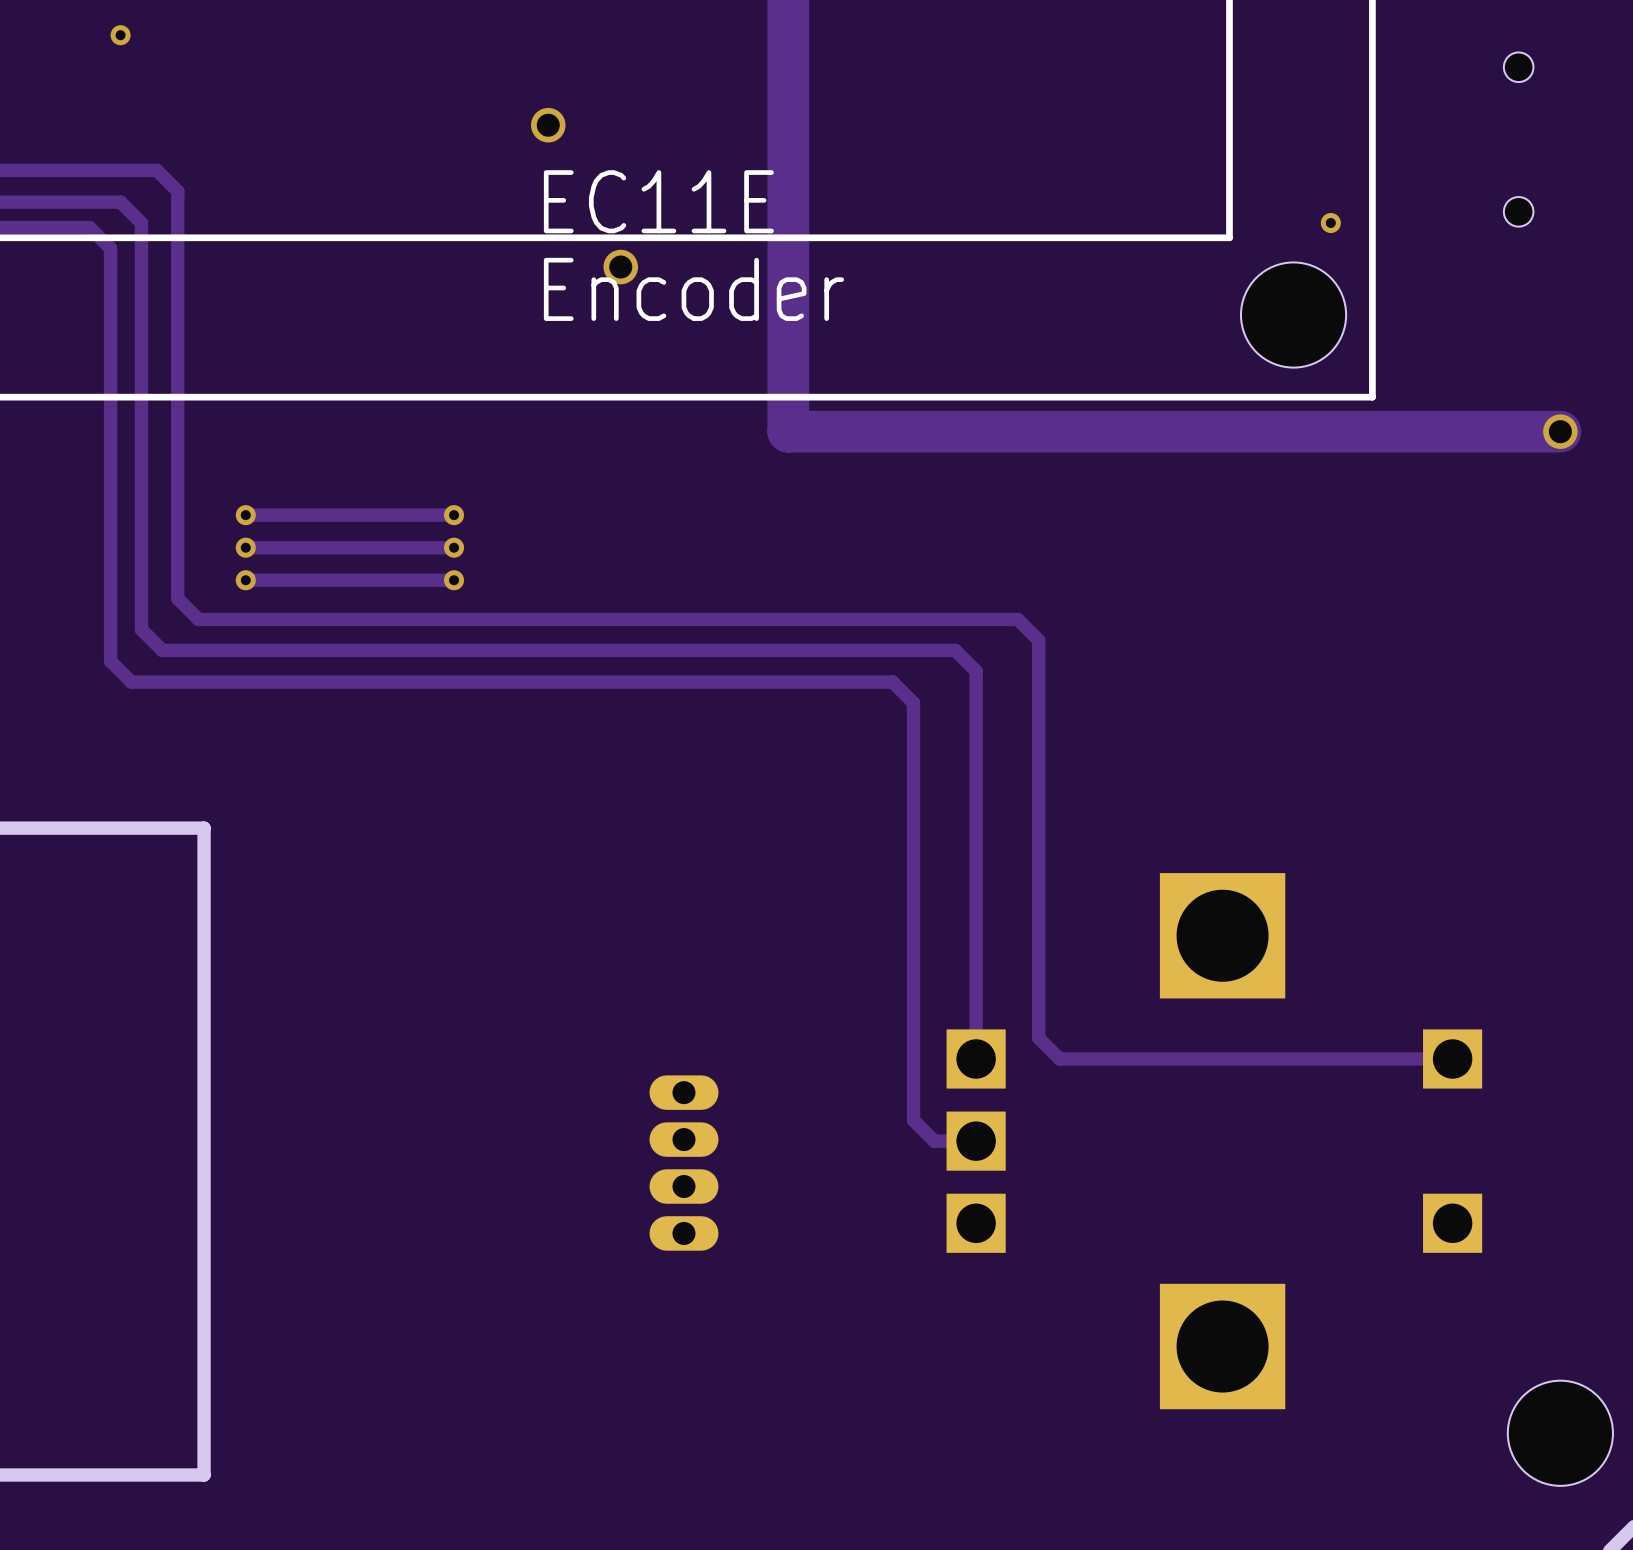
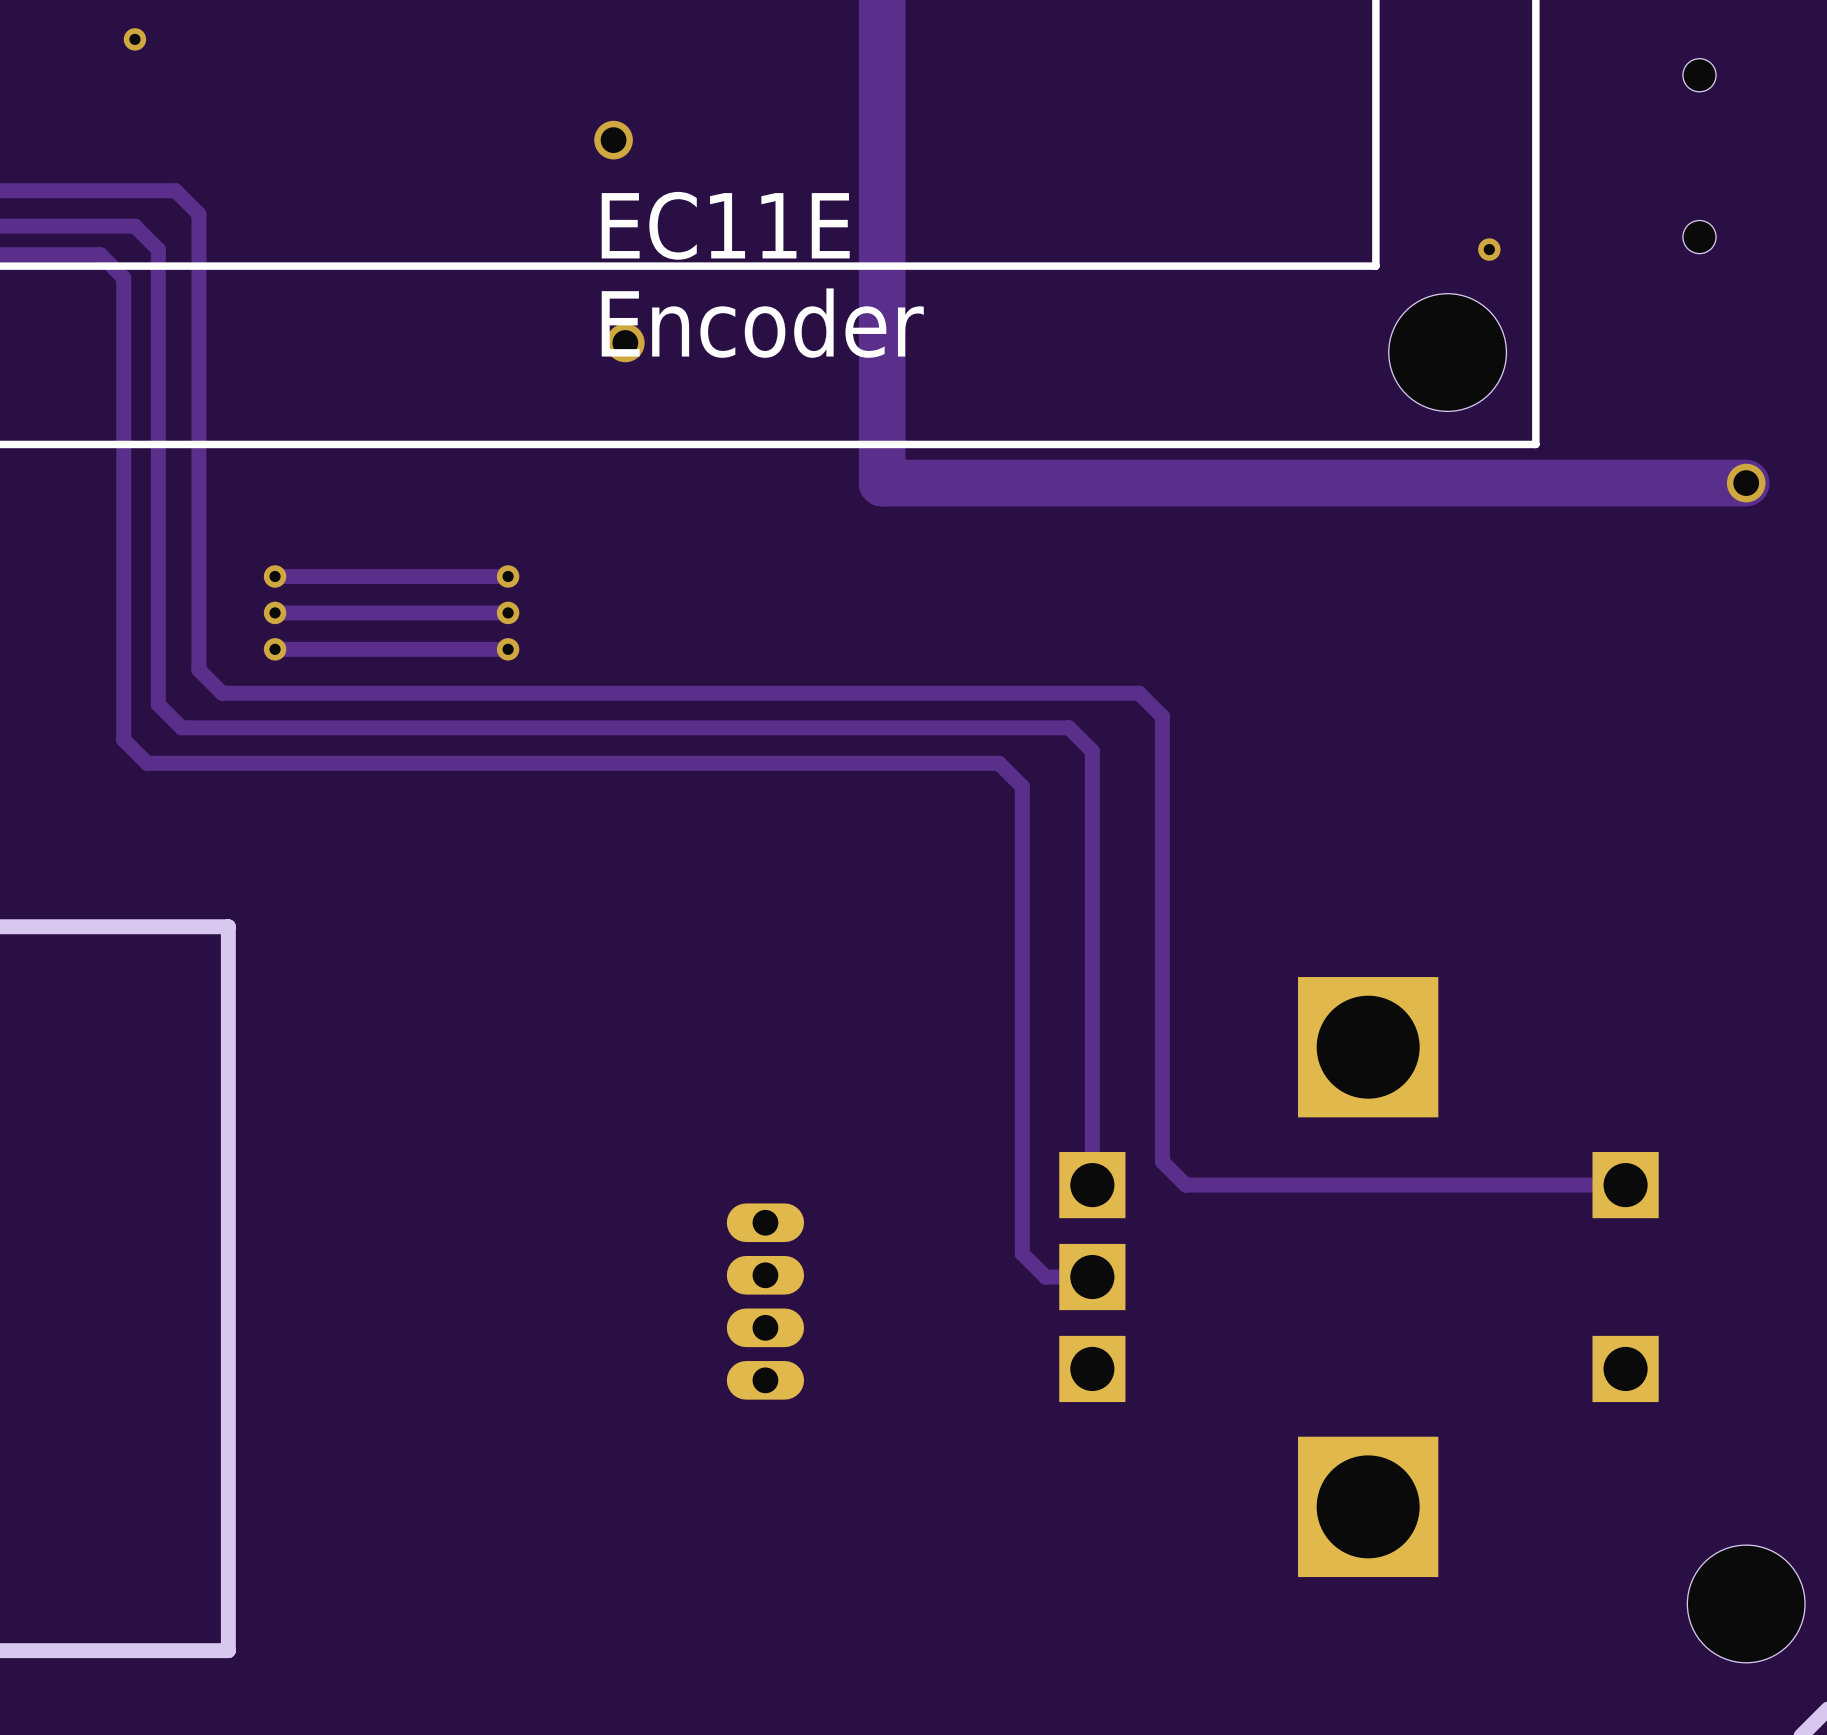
via position: (620, 267) -> (625, 342)

